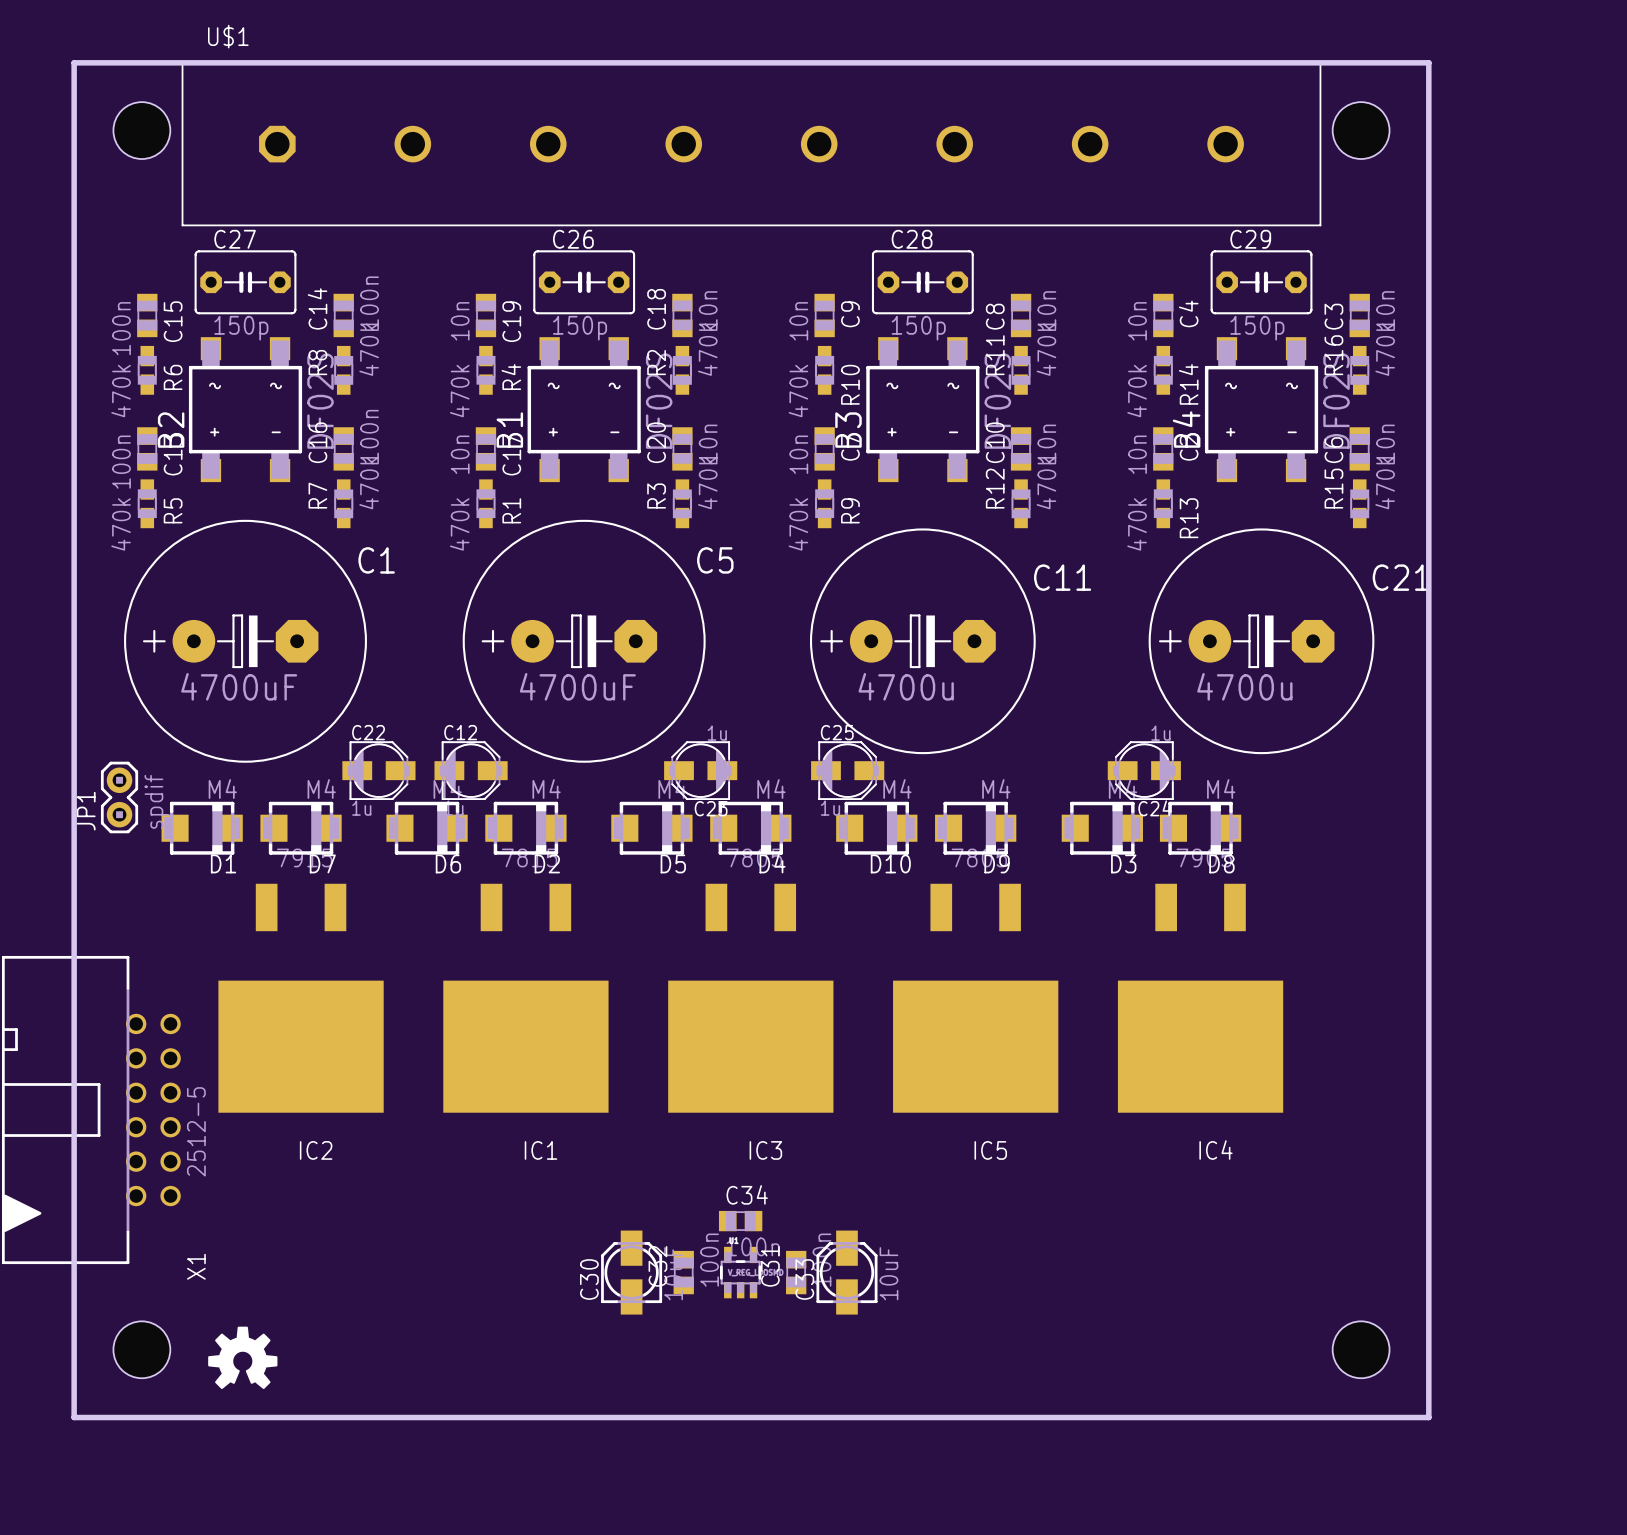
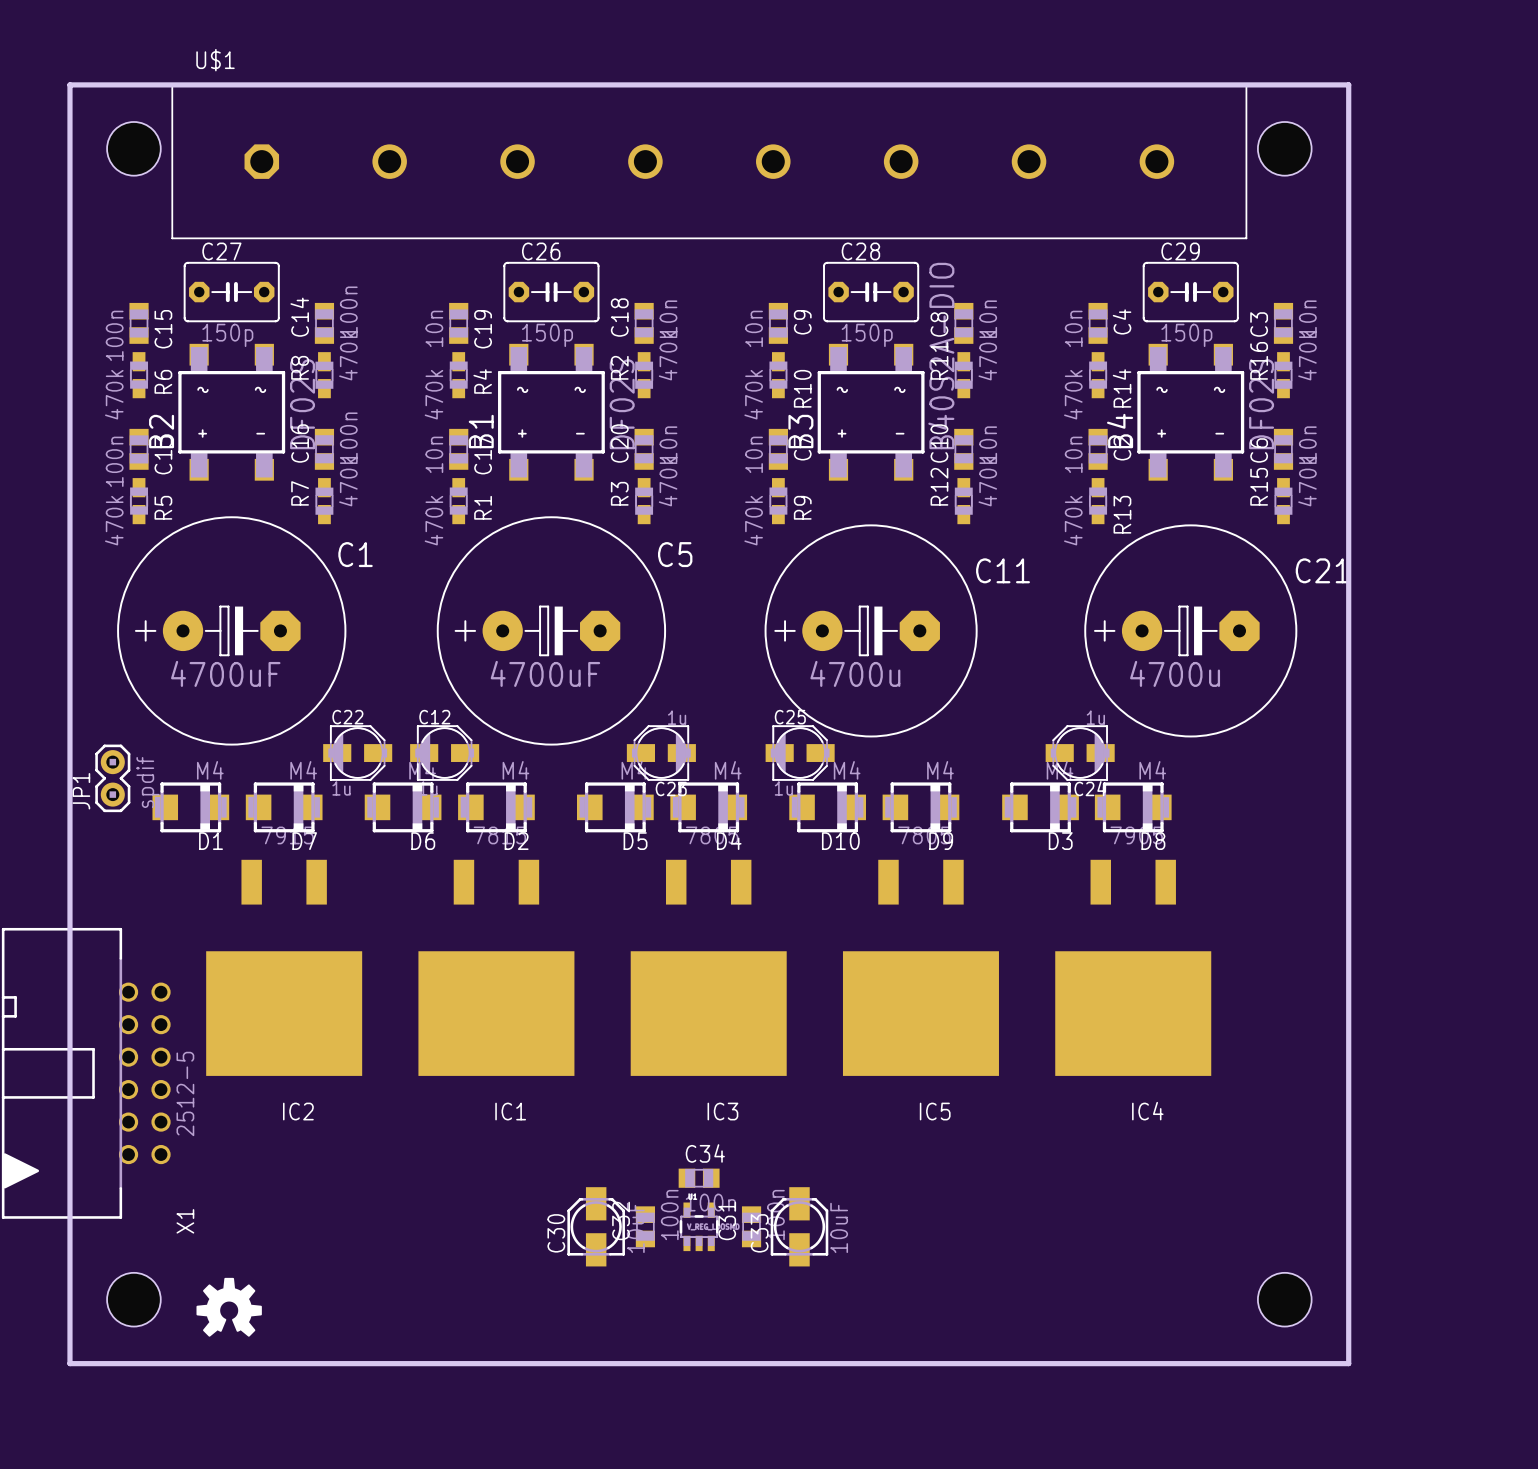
B3 value: DF02S (997, 401) -> B40S2A-DIO (941, 356)

